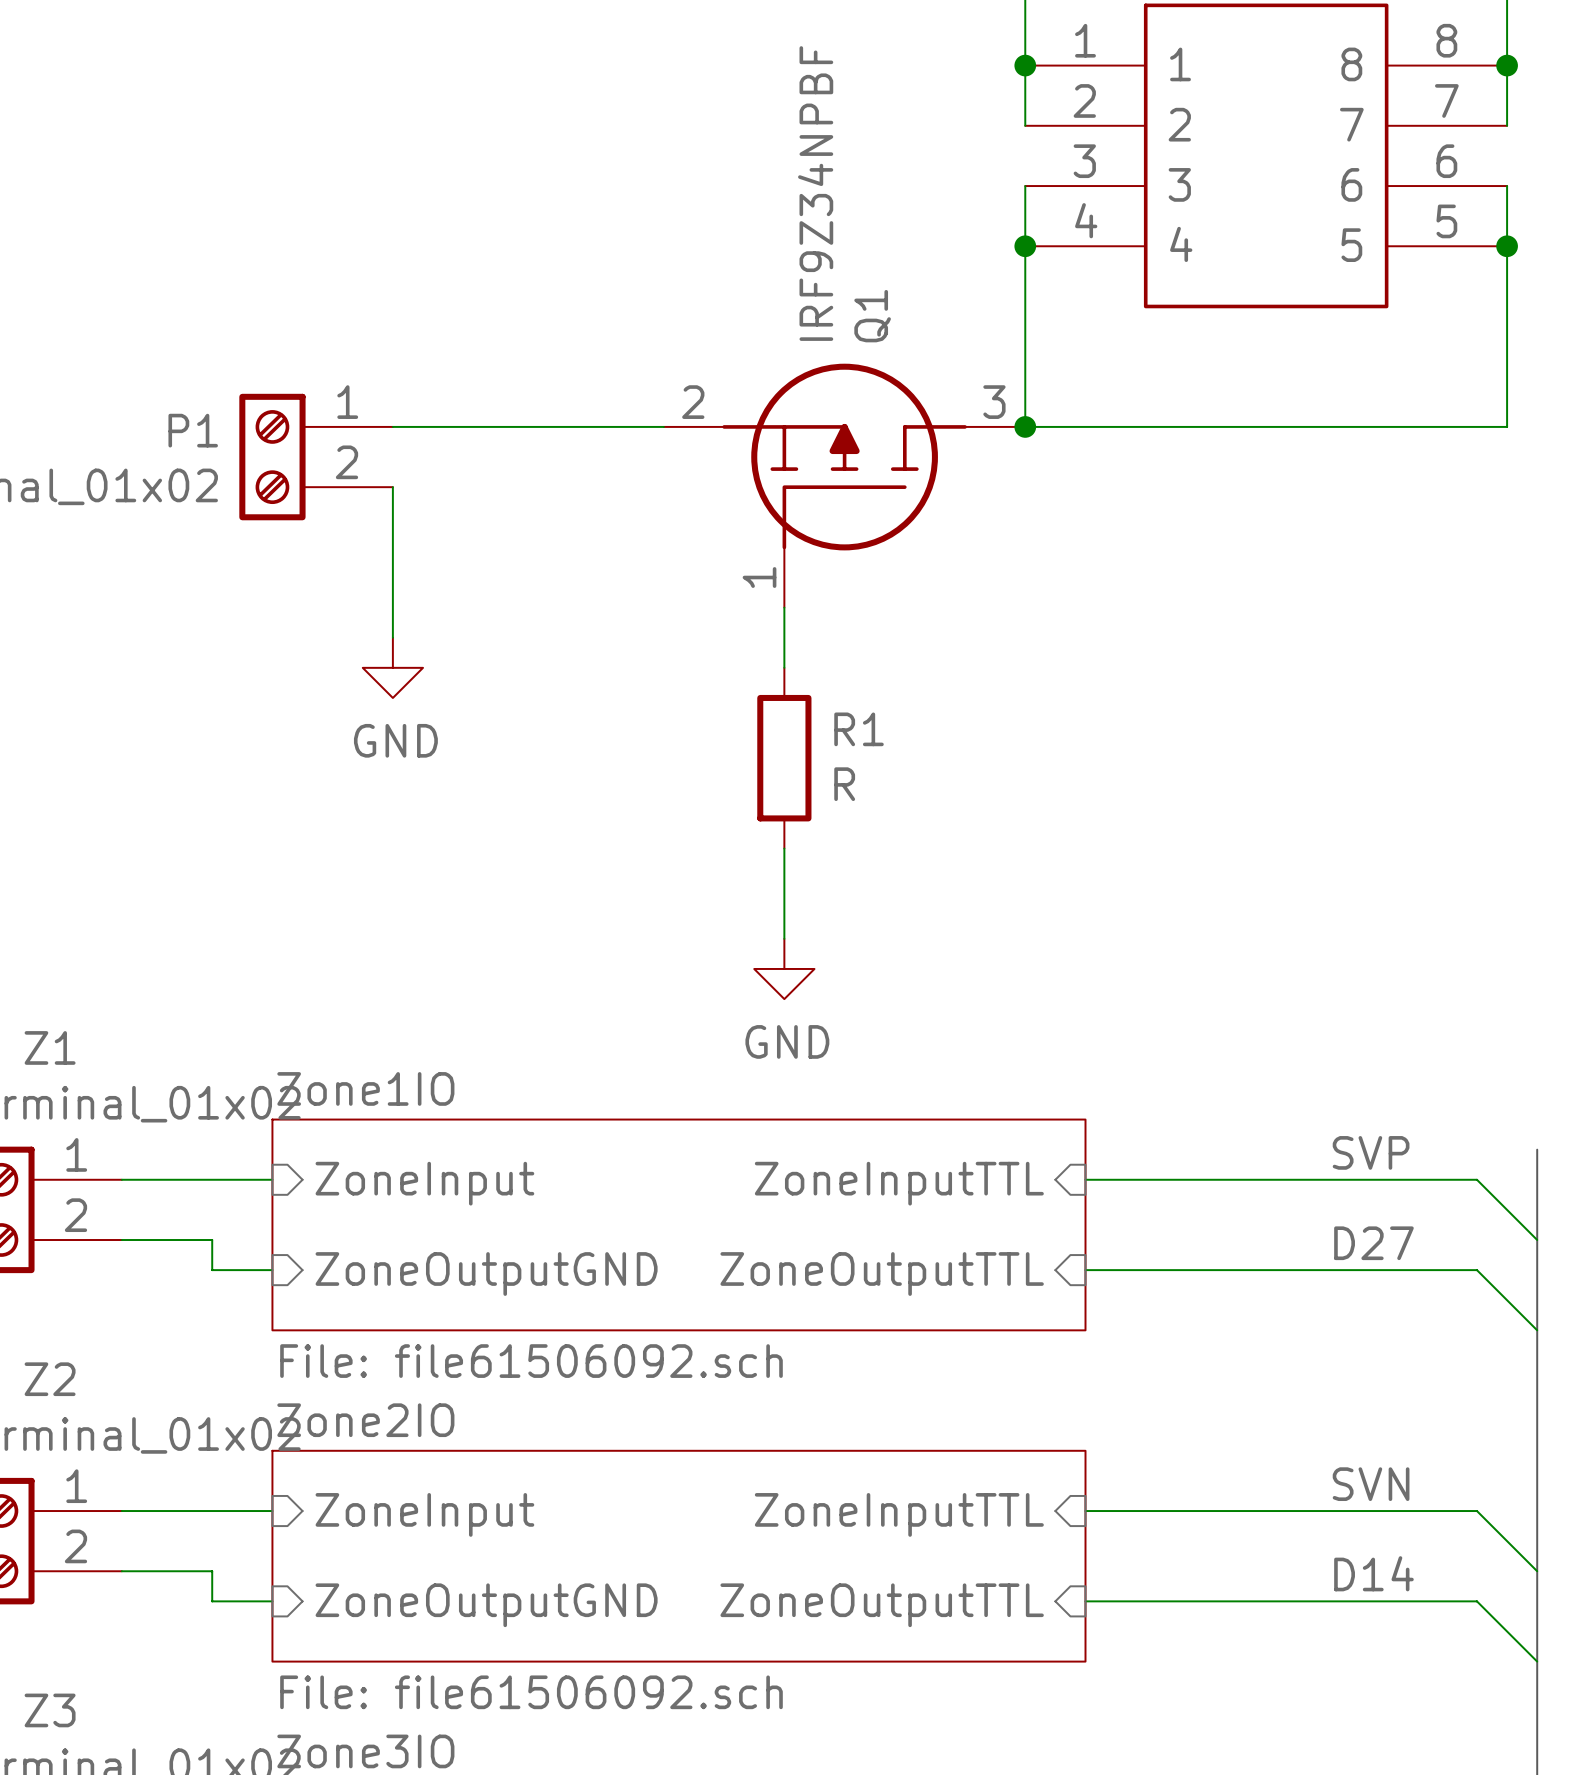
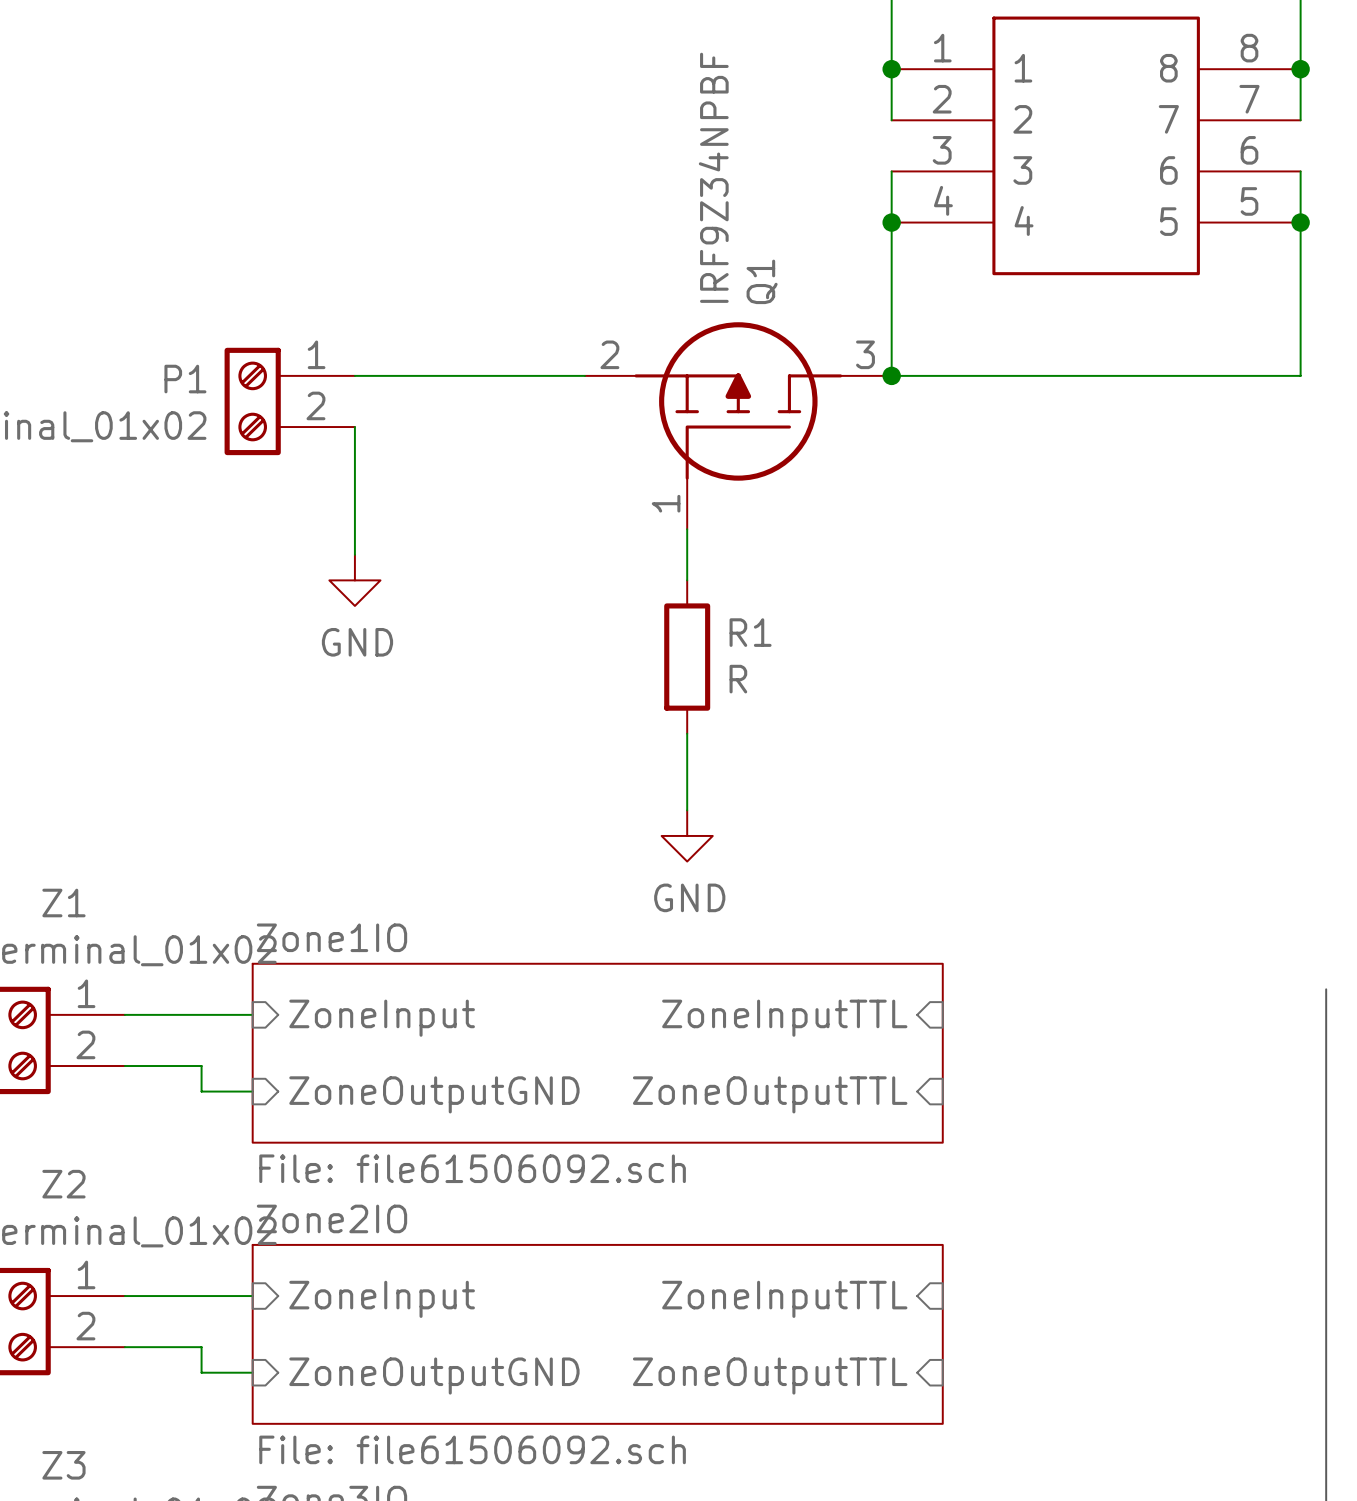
label: SVP (1371, 1152) -> none
wire: (1085, 1179) (1476, 1179) (1537, 1240) -> none
label: D27 (1373, 1243) -> none
wire: (1085, 1270) (1476, 1270) (1537, 1330) -> none
label: SVN (1371, 1484) -> none
wire: (1085, 1511) (1476, 1511) (1537, 1571) -> none
label: D14 (1373, 1573) -> none
wire: (1085, 1601) (1476, 1601) (1537, 1661) -> none

